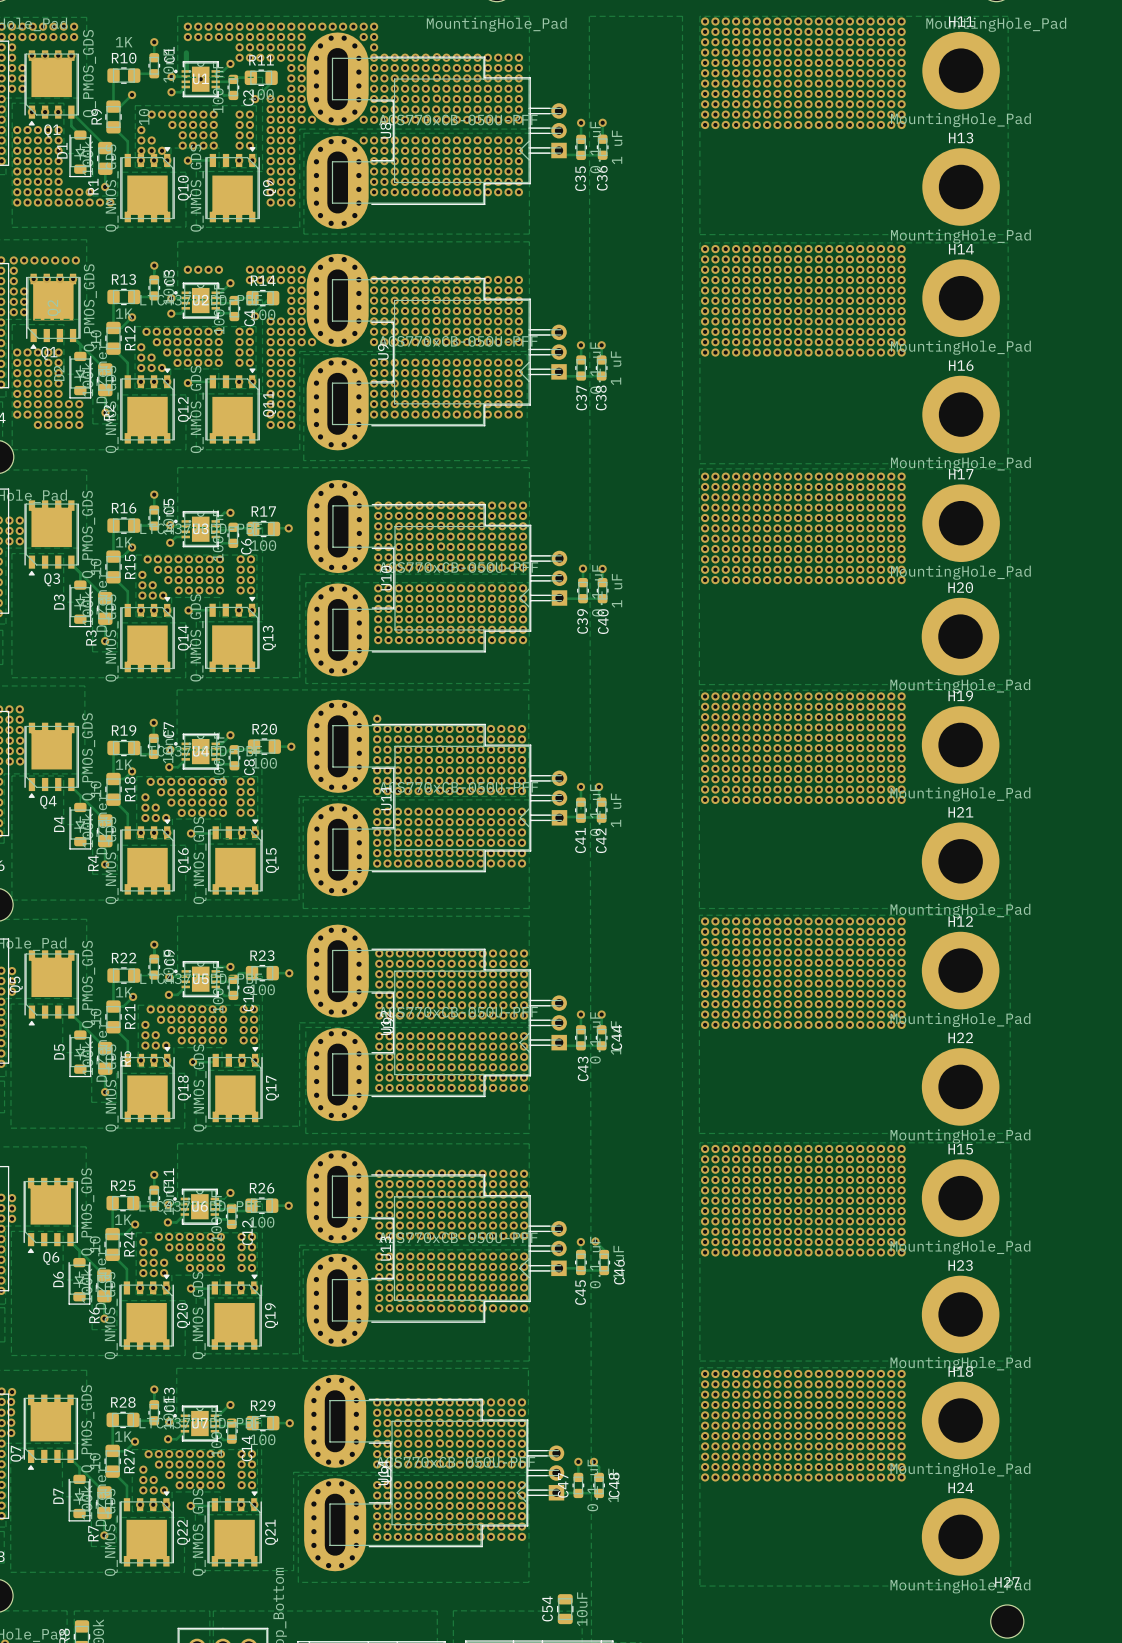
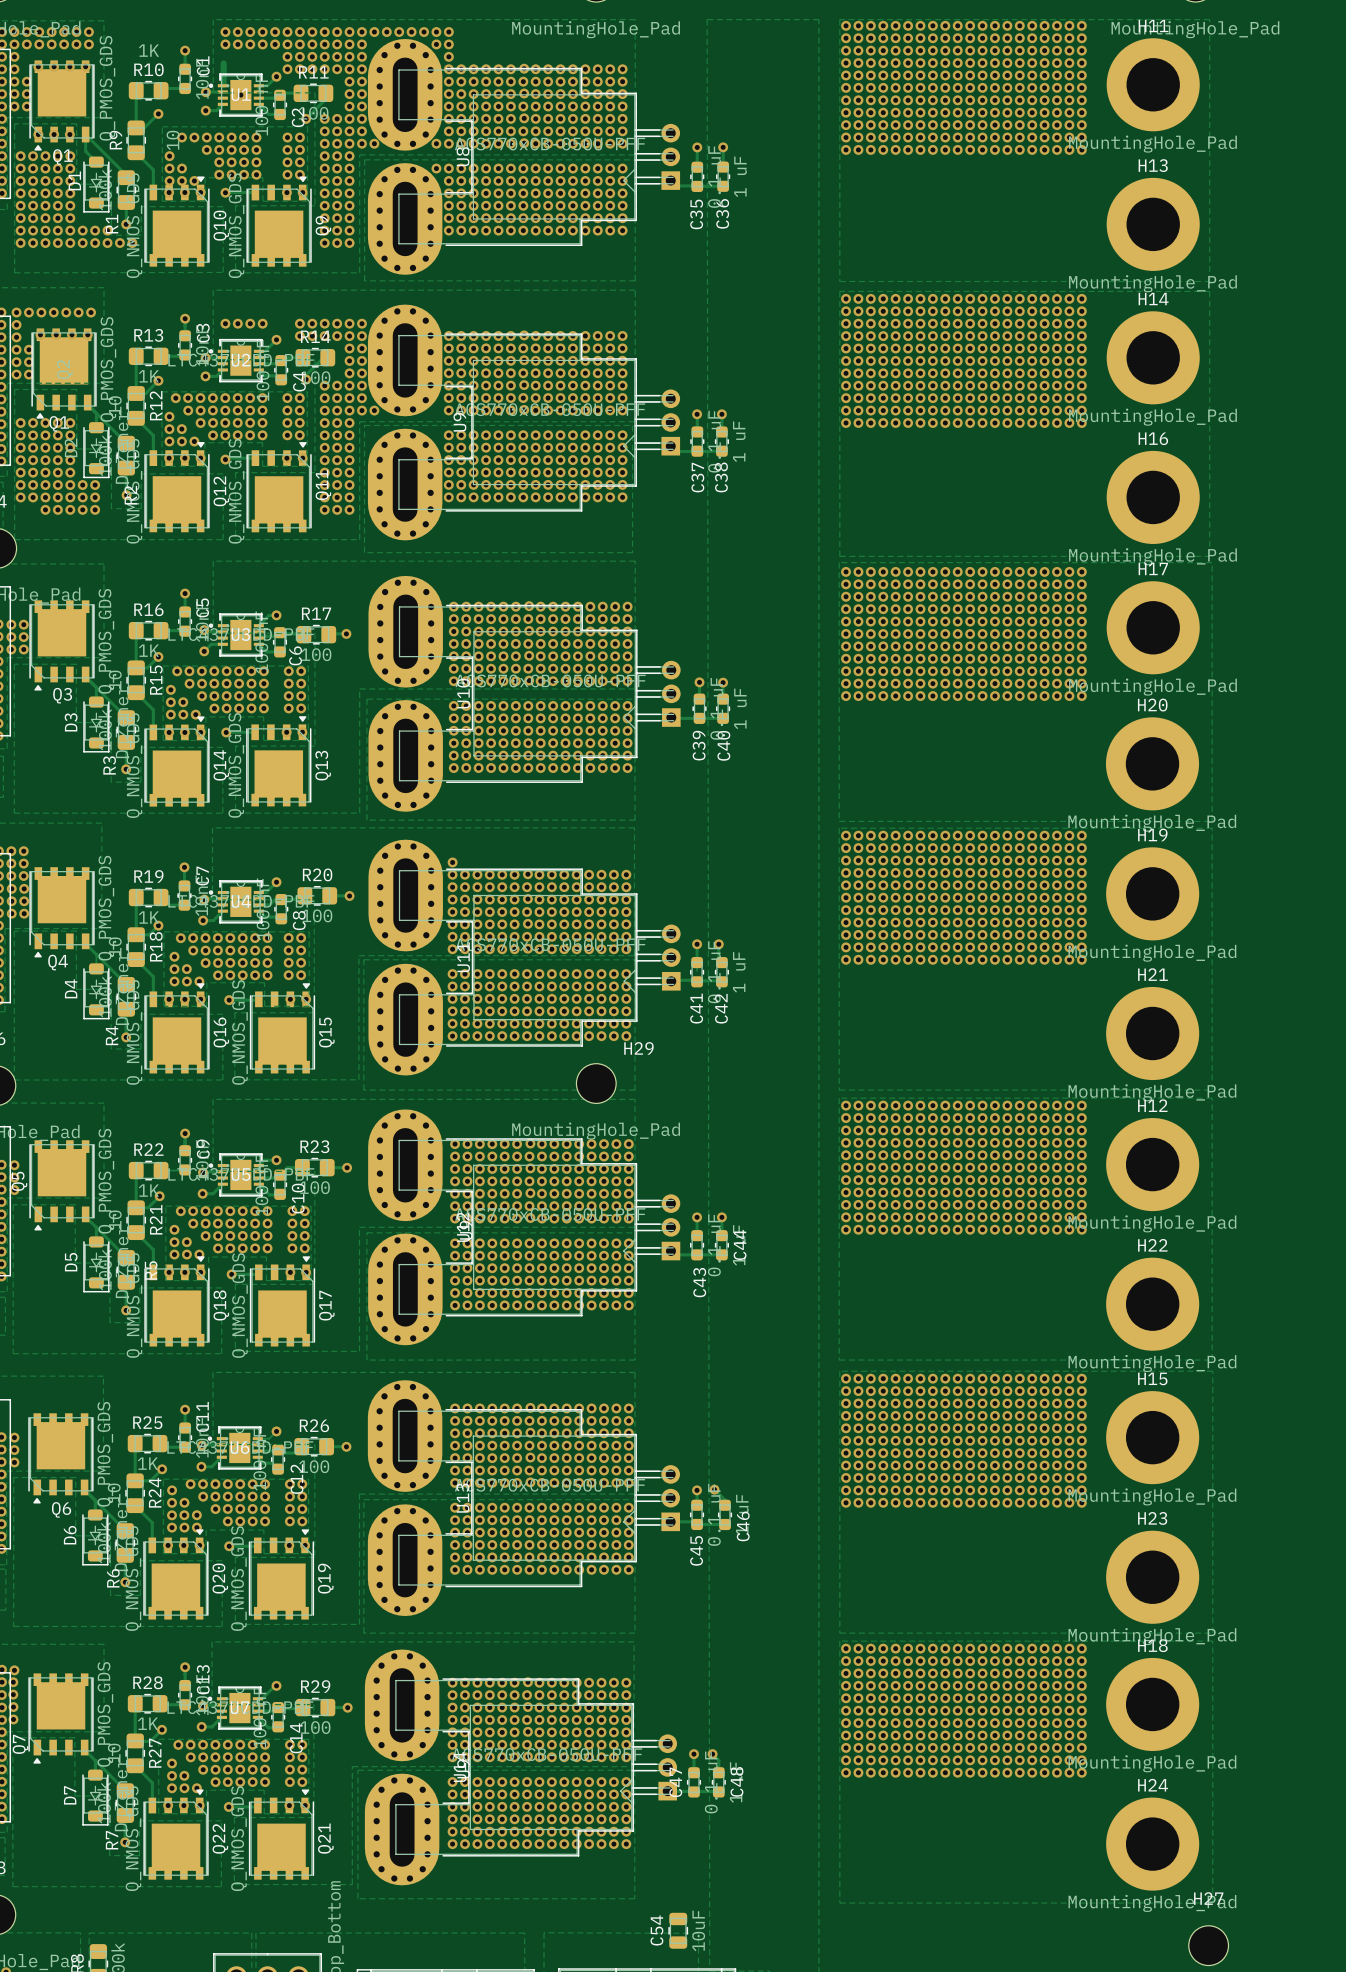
H29: none -> MountingHole_Pad (596, 1083)

